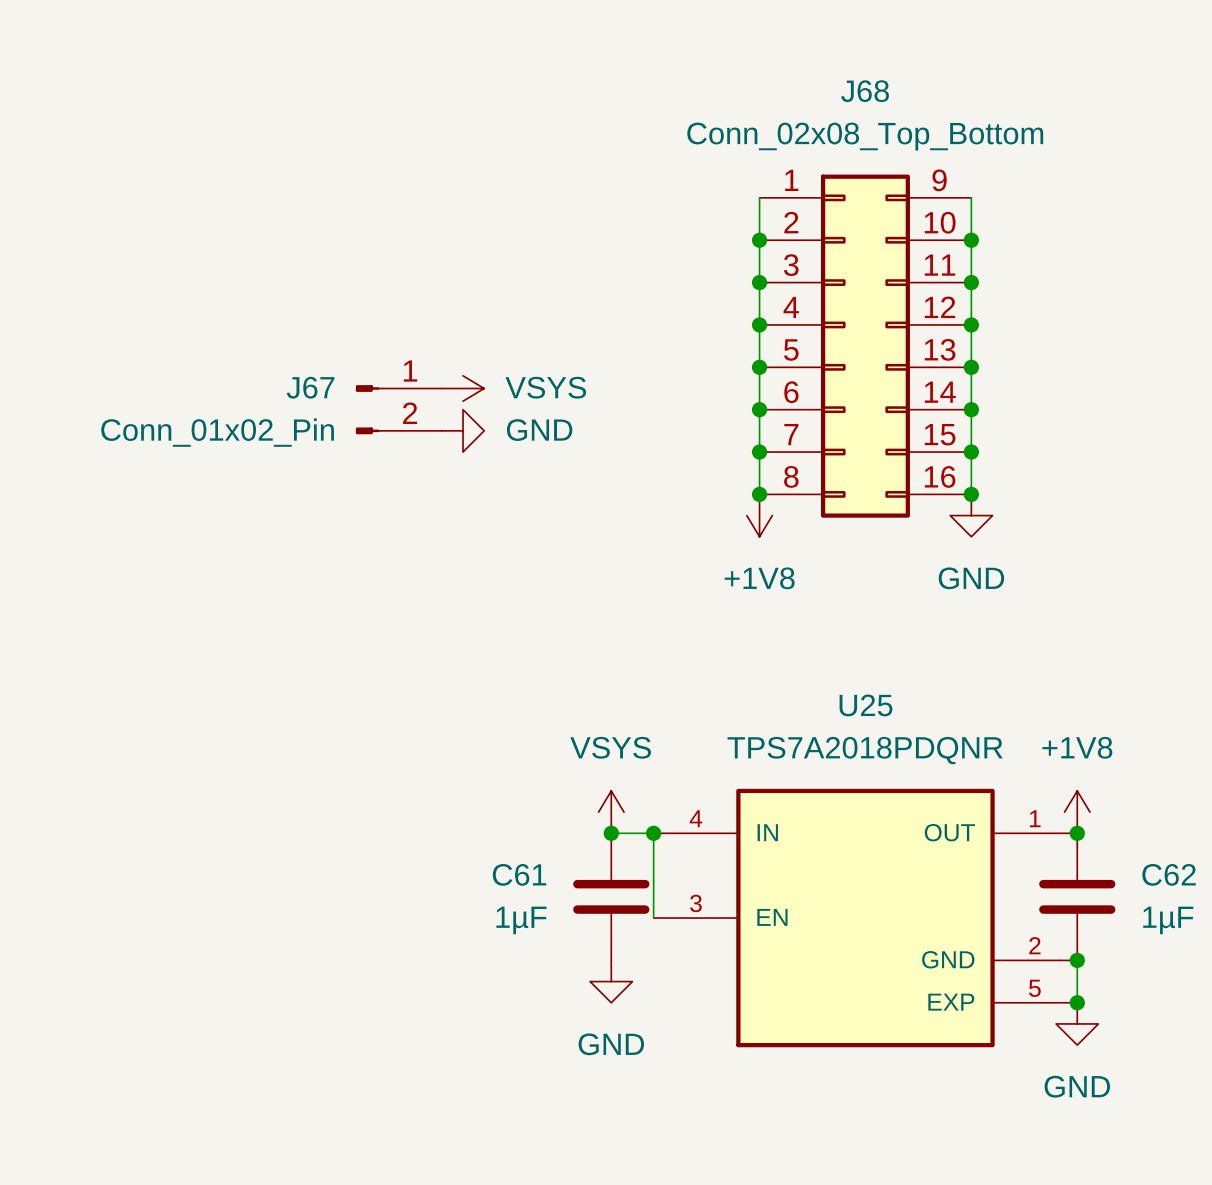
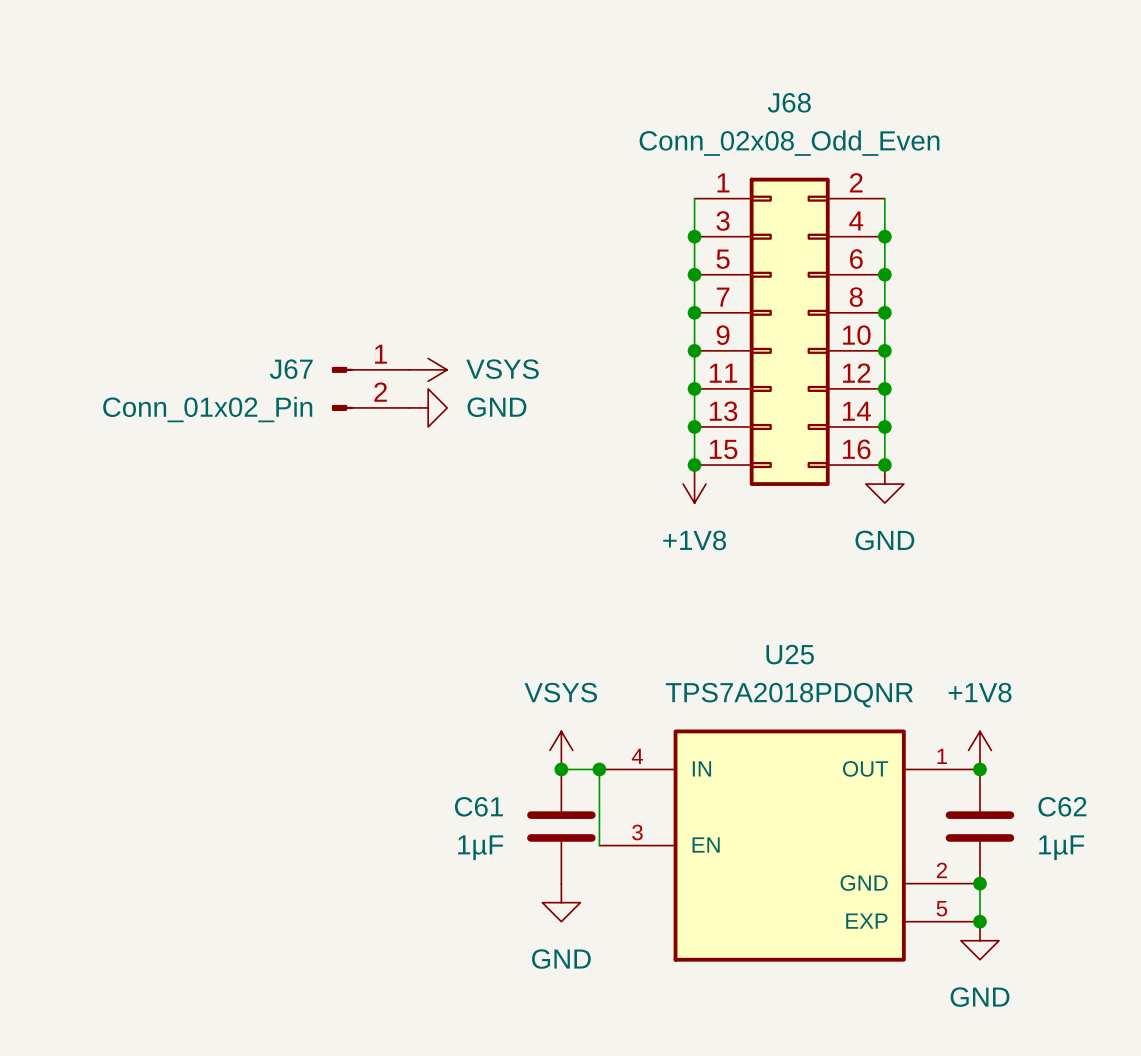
J68 value: Conn_02x08_Top_Bottom (865, 136) -> Conn_02x08_Odd_Even (789, 143)
J68 symbol: [759, 174, 972, 518] -> [694, 177, 885, 486]

